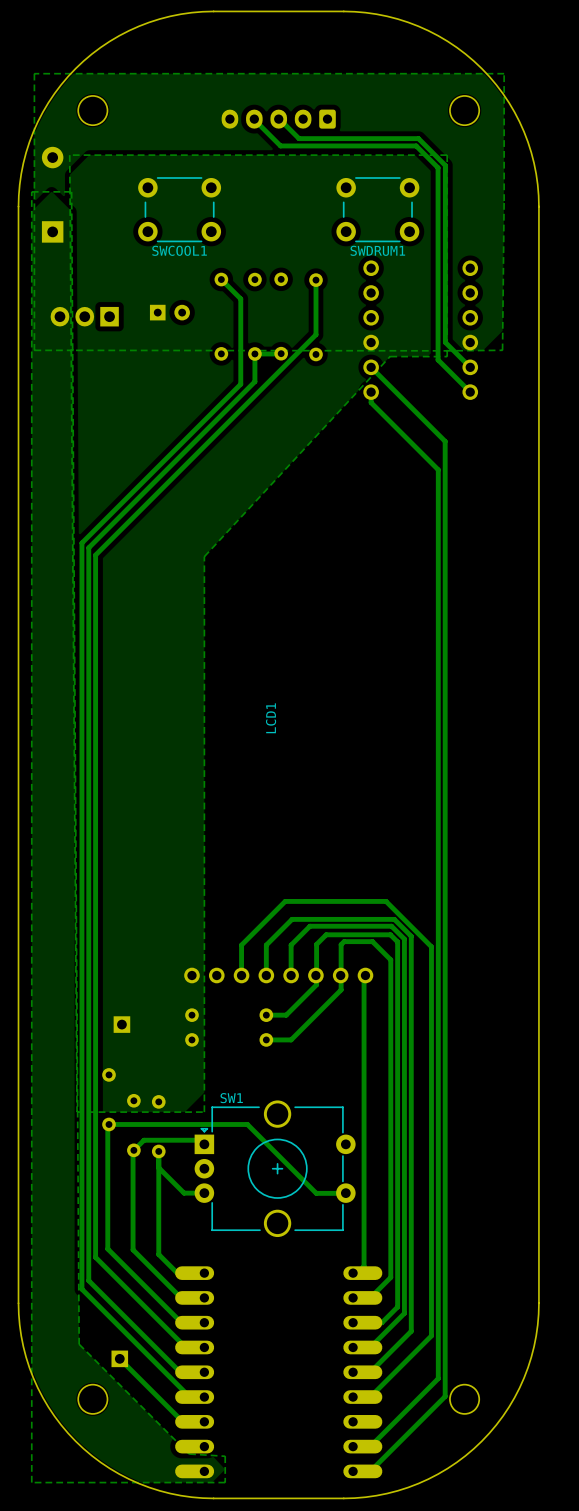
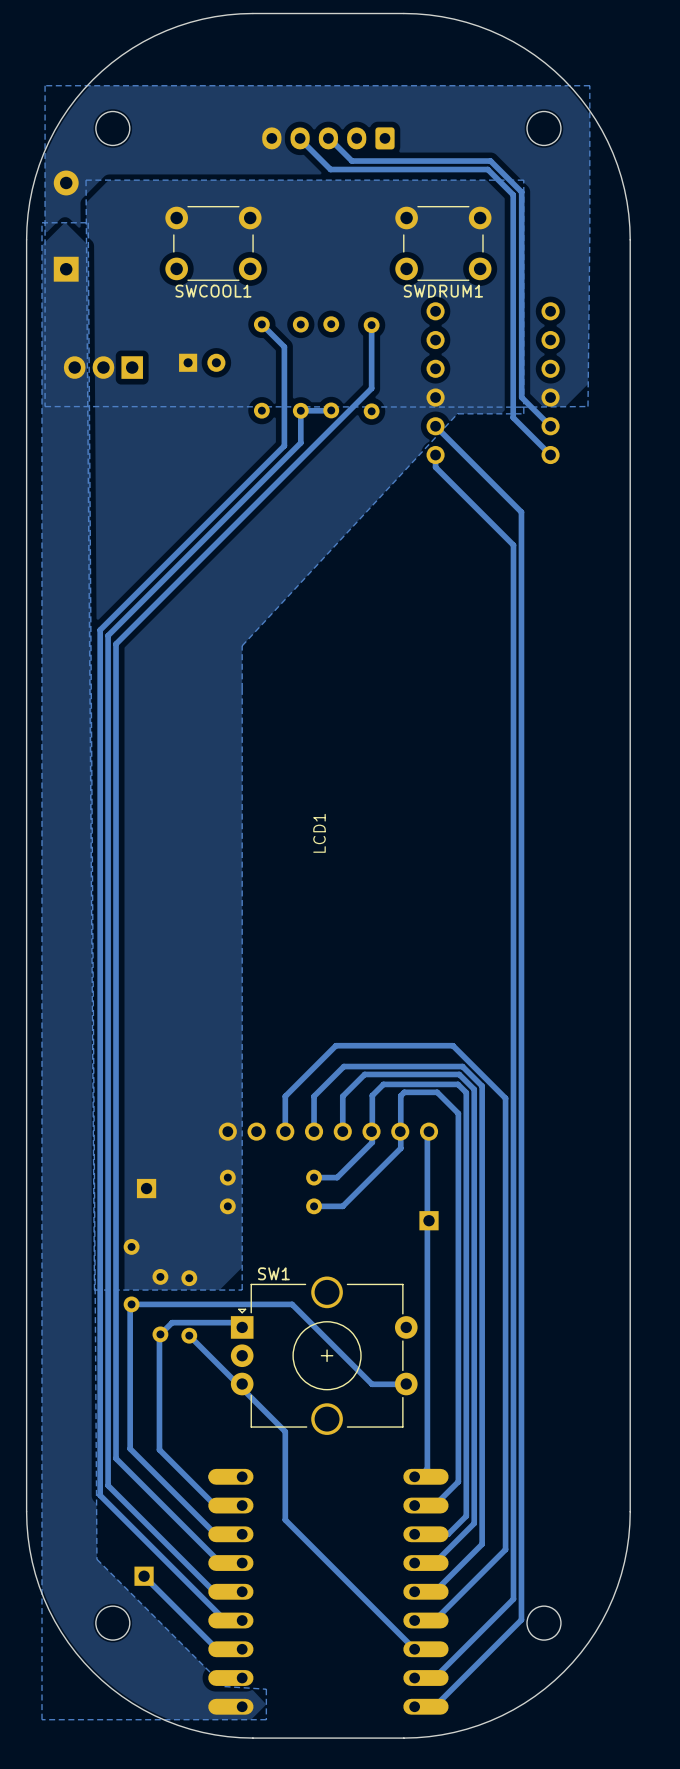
part: none -> (429, 1220)
track: (158, 1151) (158, 1254) (177, 1273) -> (189, 1335) (285, 1431) (285, 1519) (414, 1649)
track: (158, 1167) (184, 1193) (204, 1193) -> none

